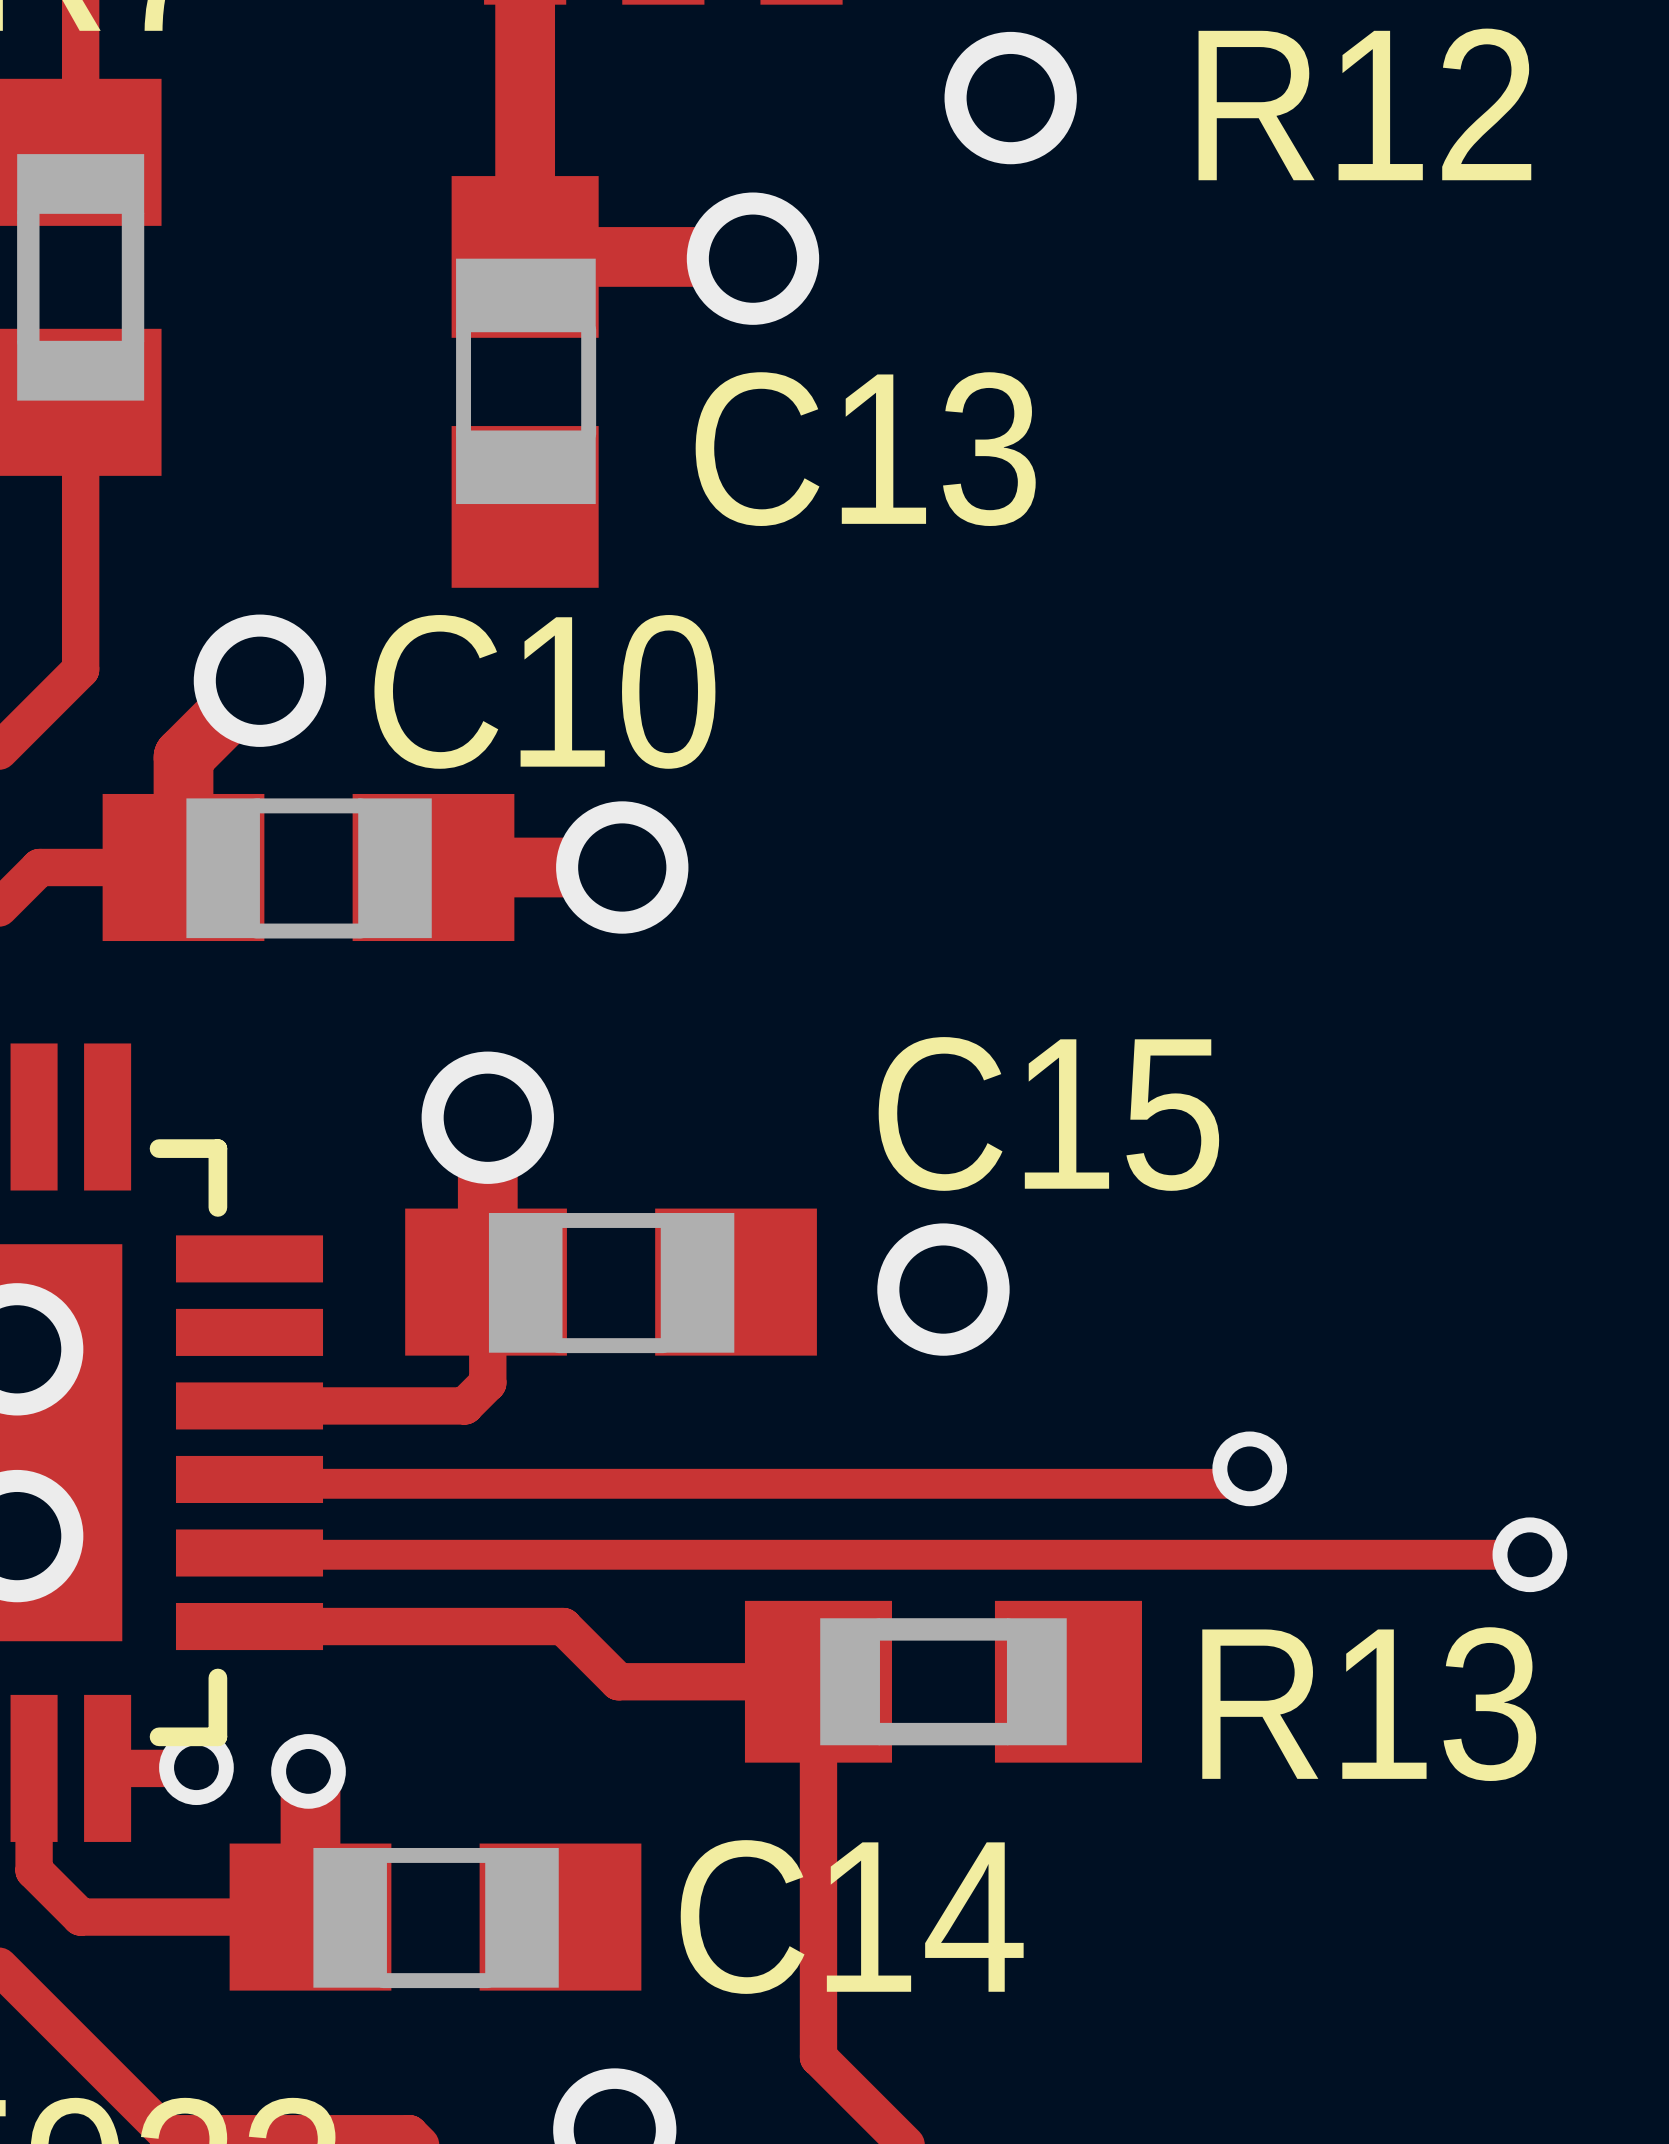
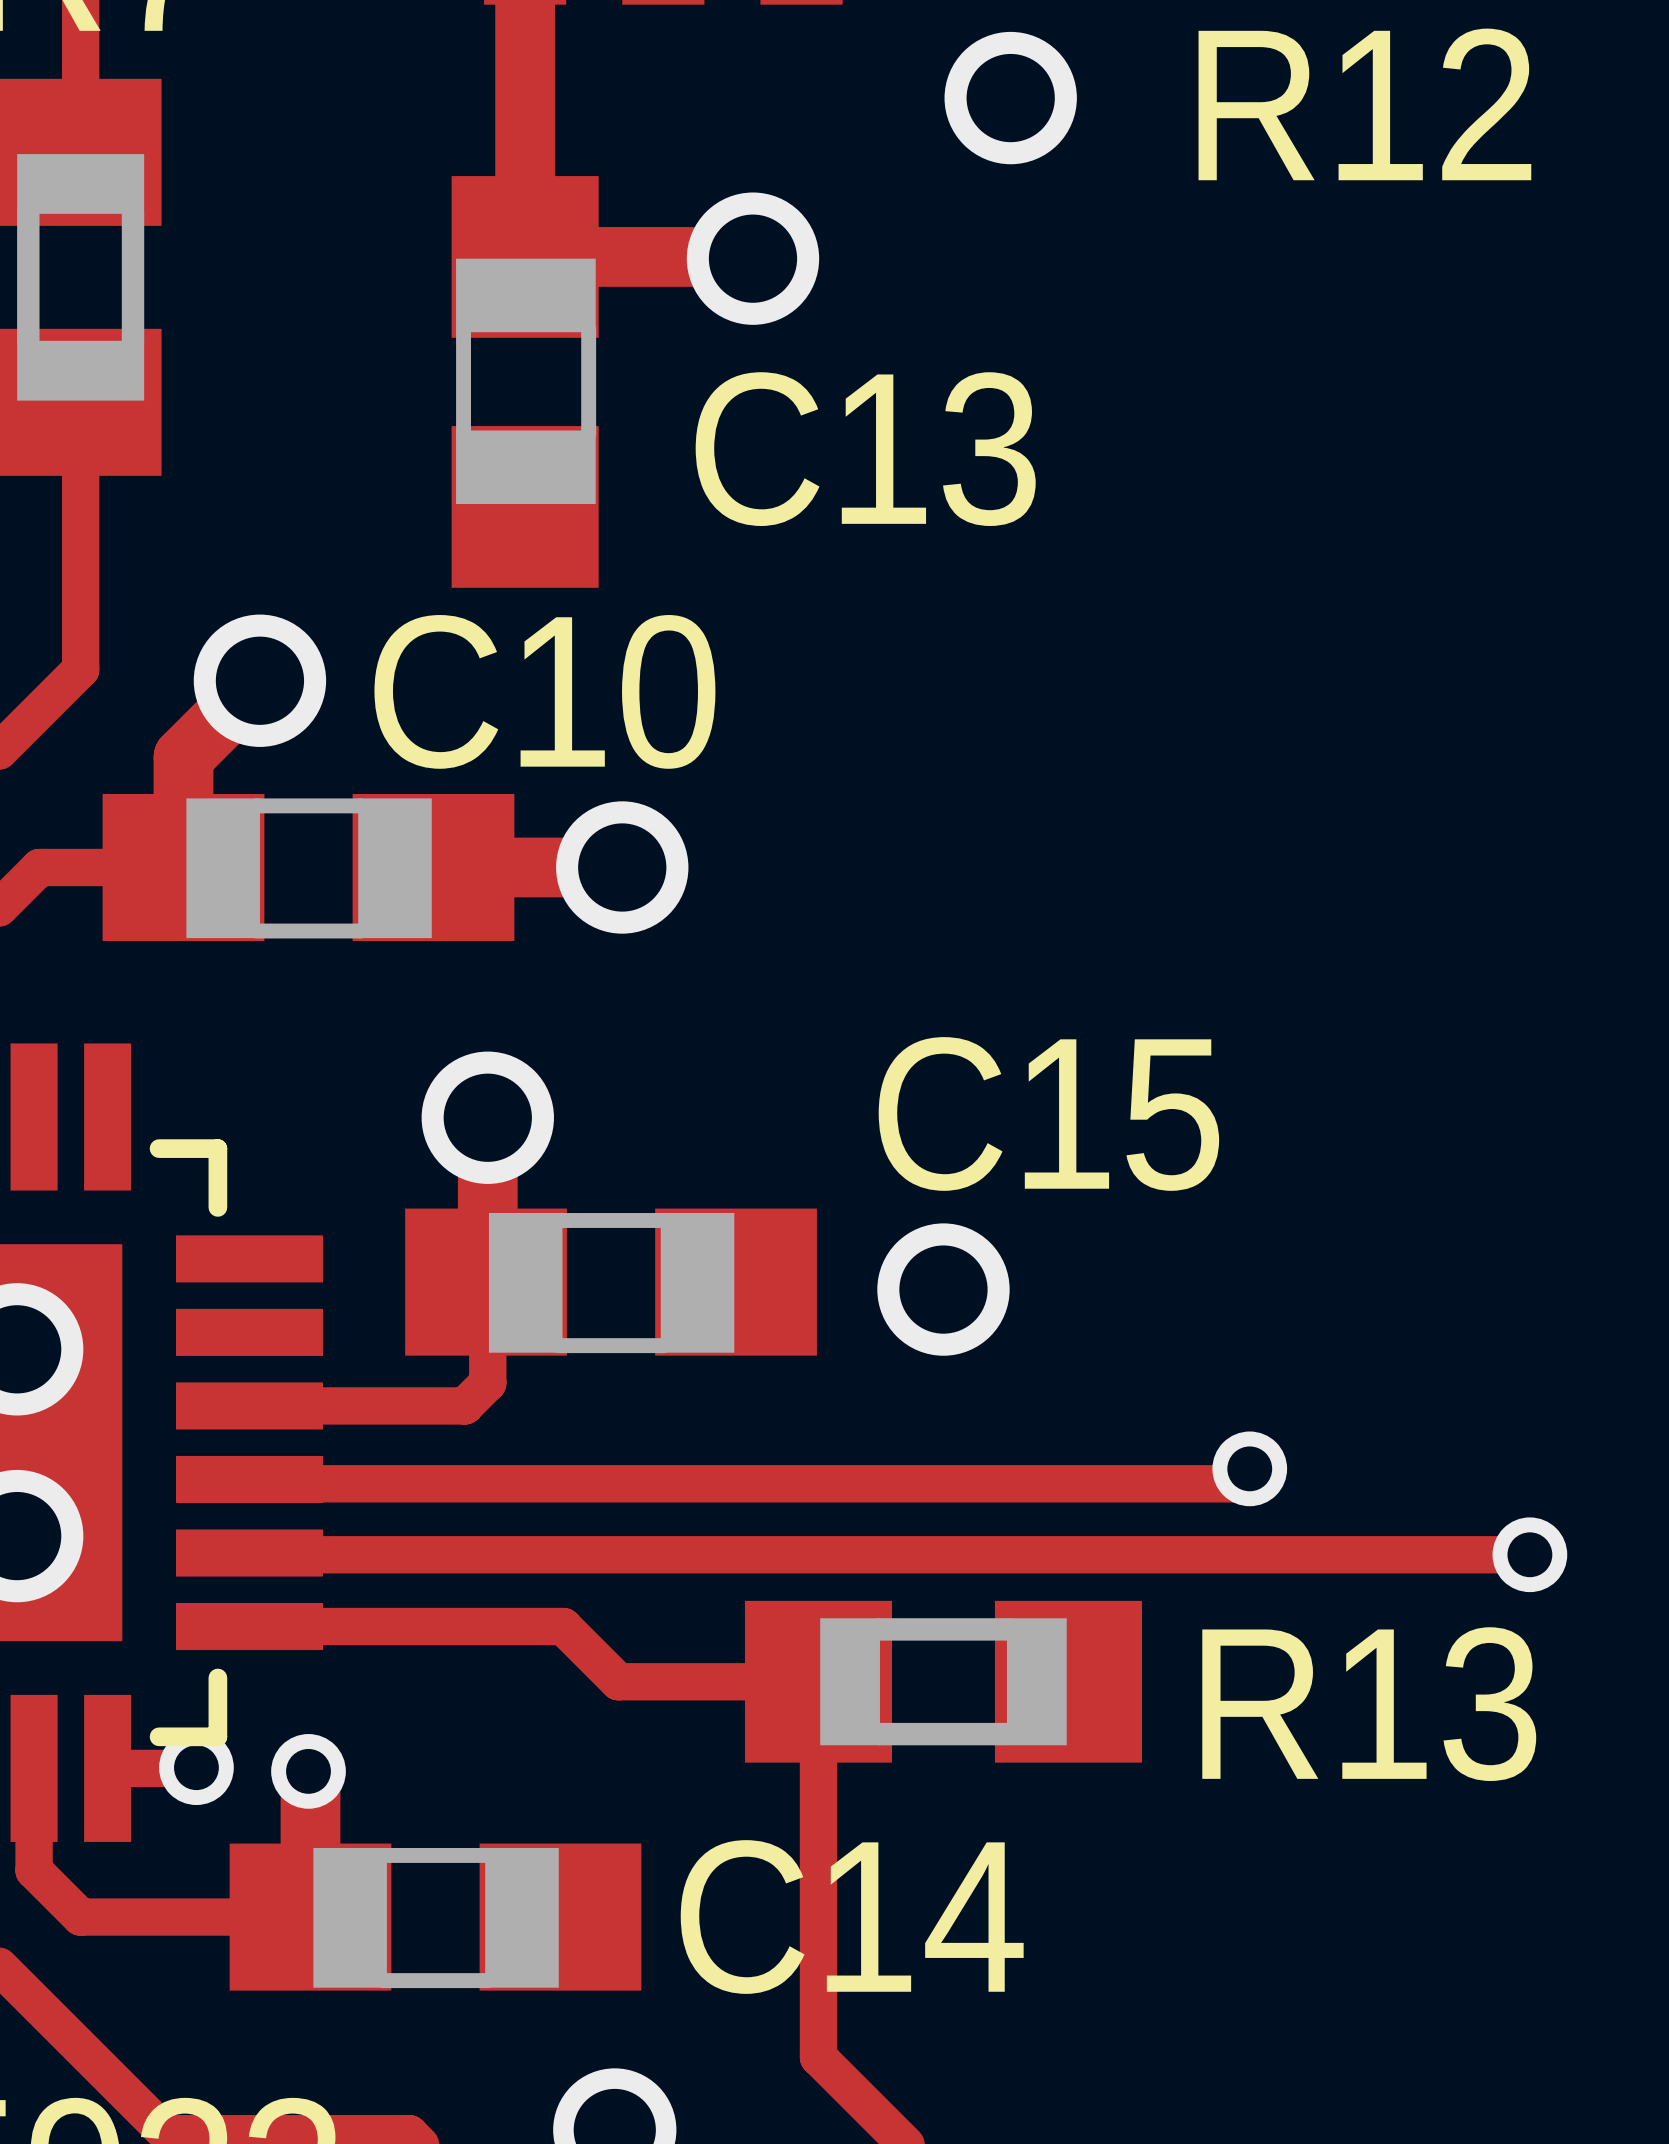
top track width: thin (1249, 1468) (1234, 1483) (253, 1483) -> thick (1249, 1468) (1234, 1483) (253, 1483)
top track width: thin (251, 1554) (1529, 1554) -> thick (251, 1554) (1529, 1554)

